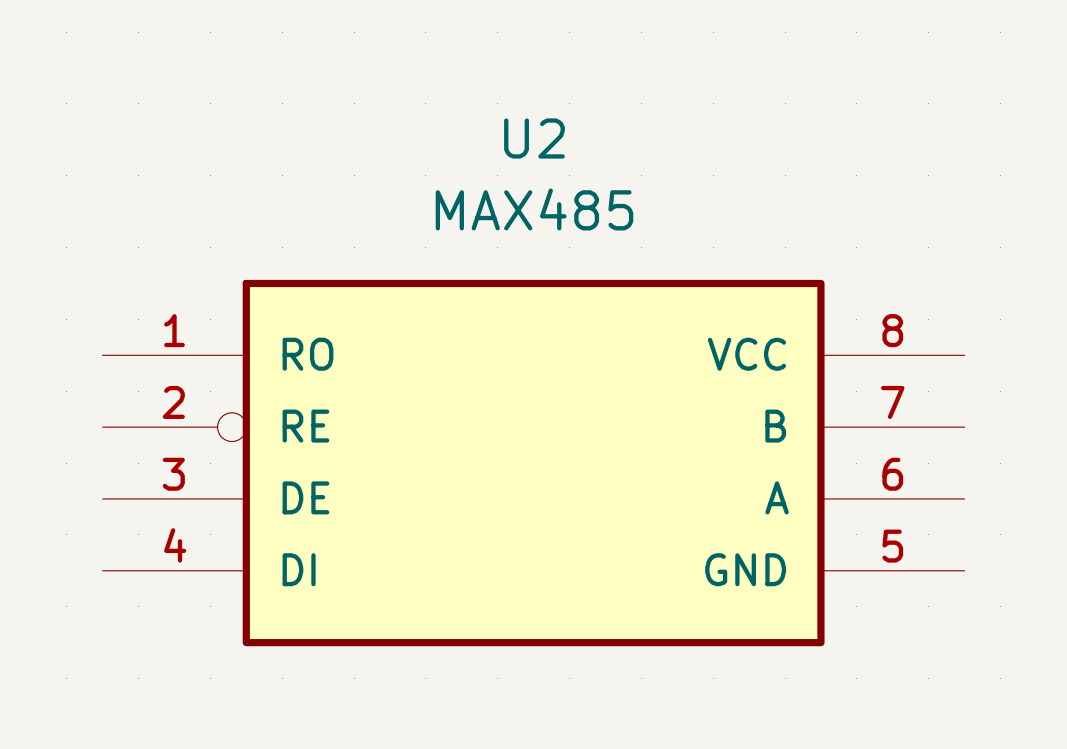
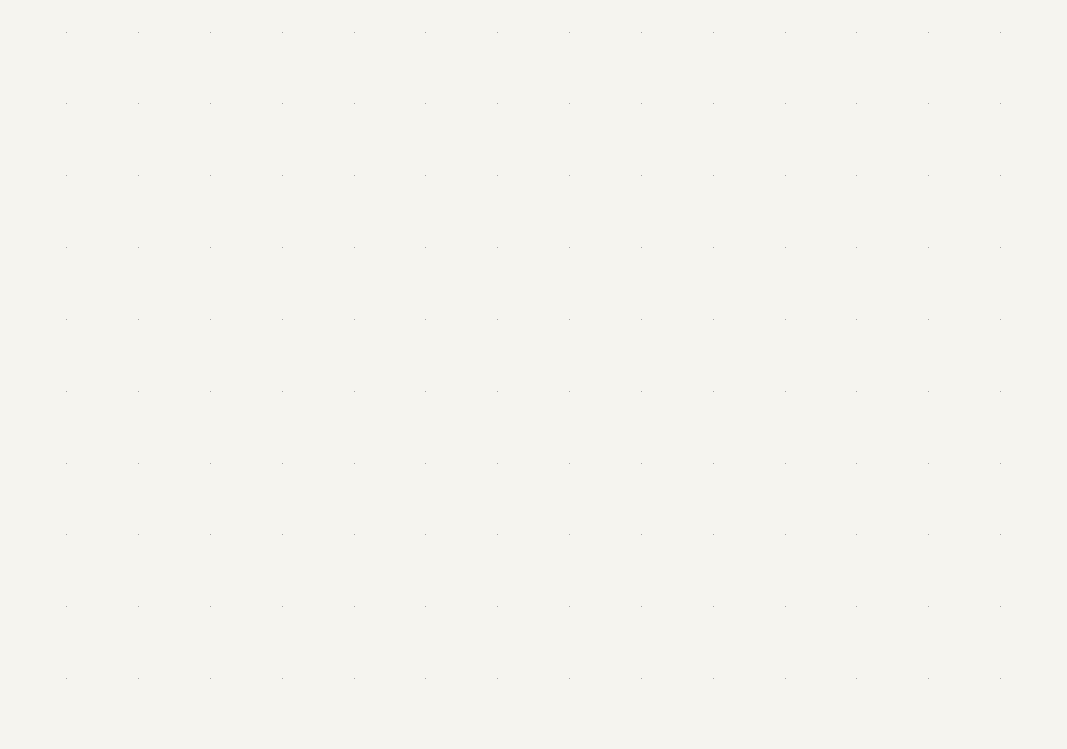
U2: MAX485 (533, 463) -> none

